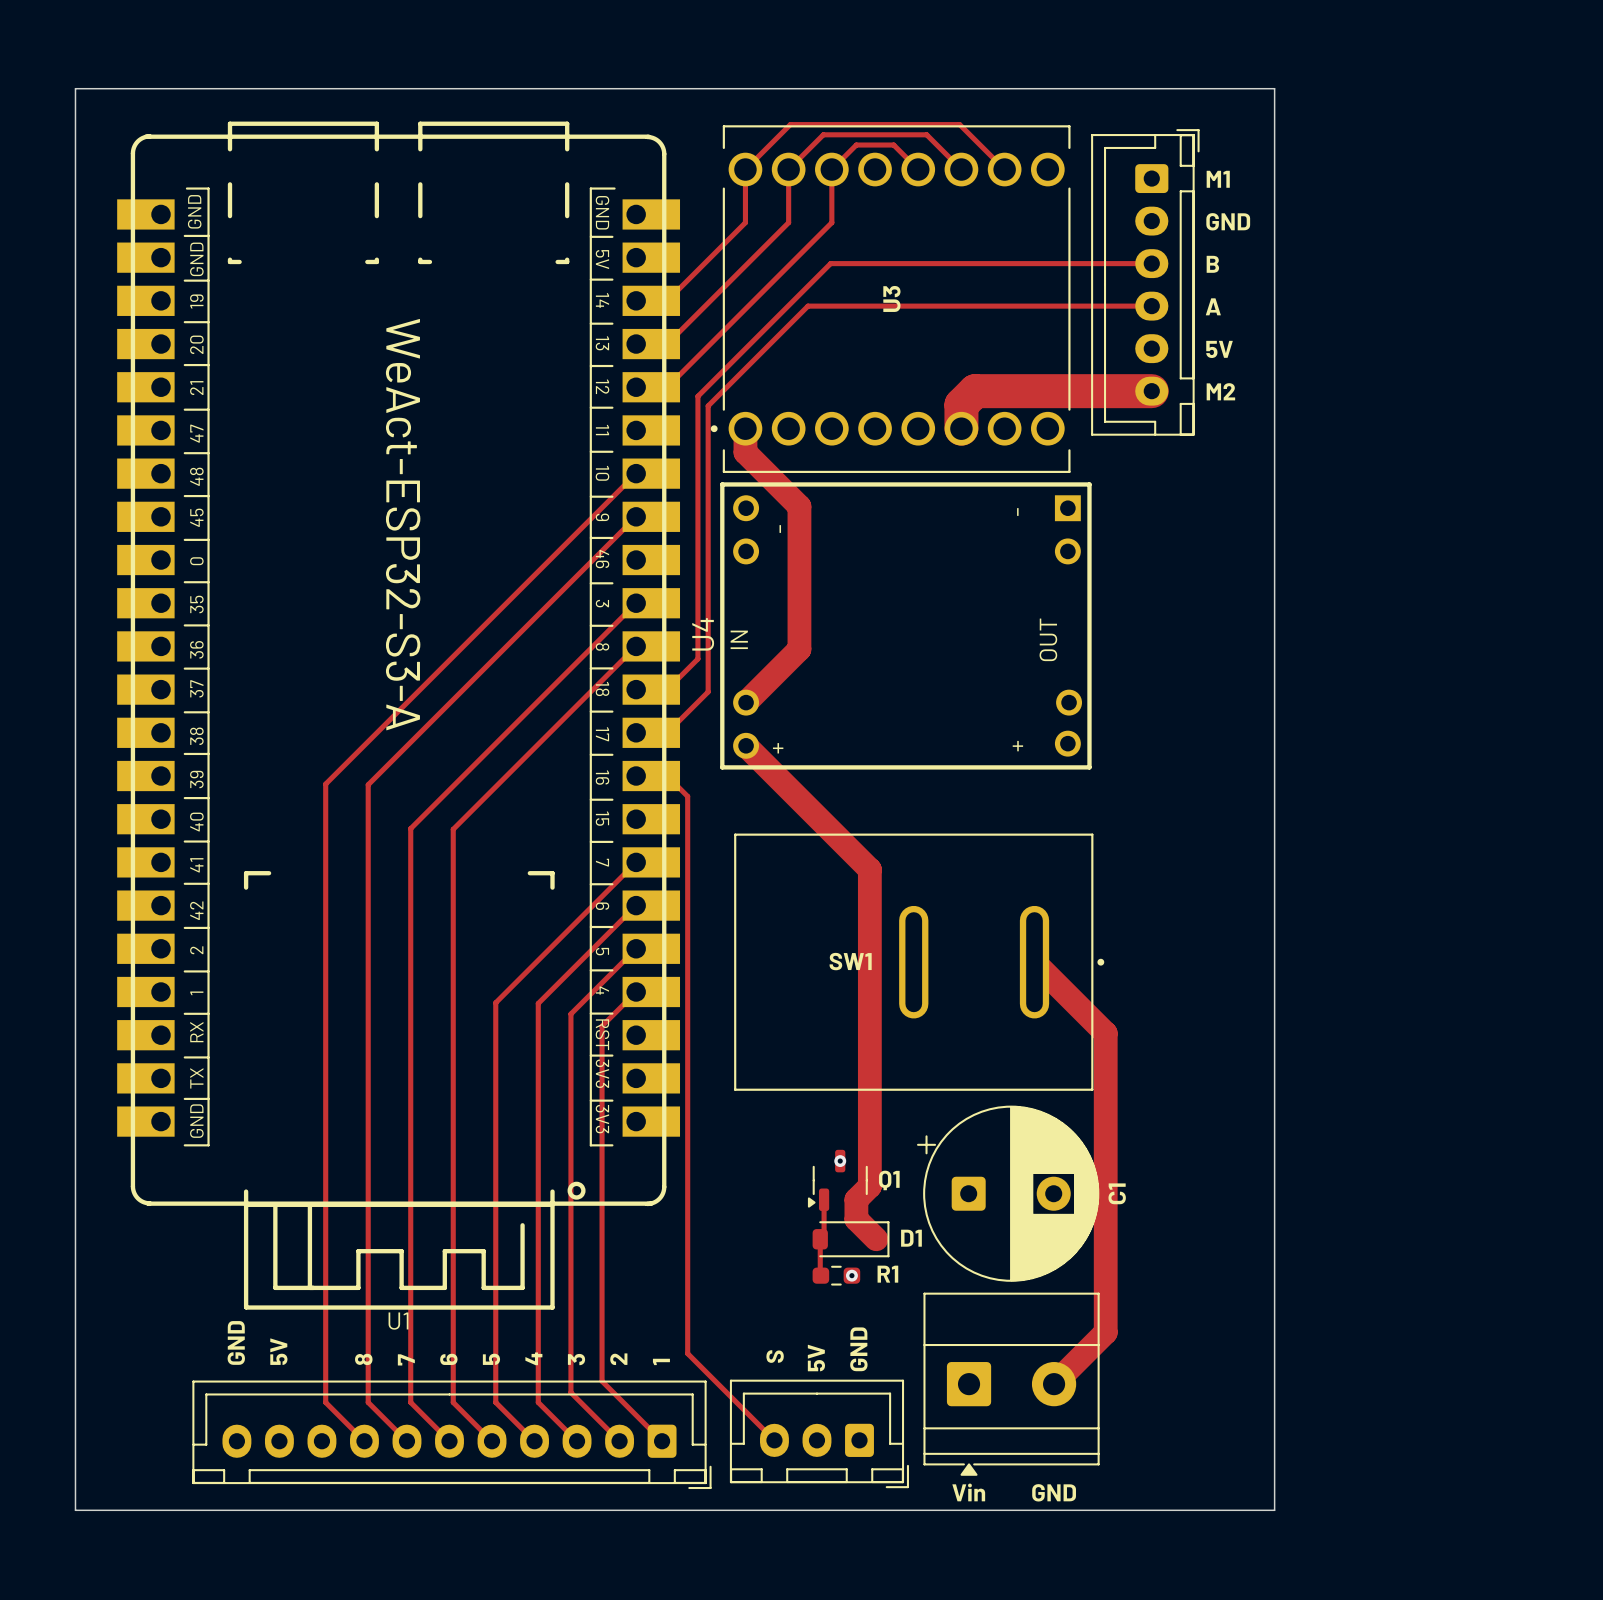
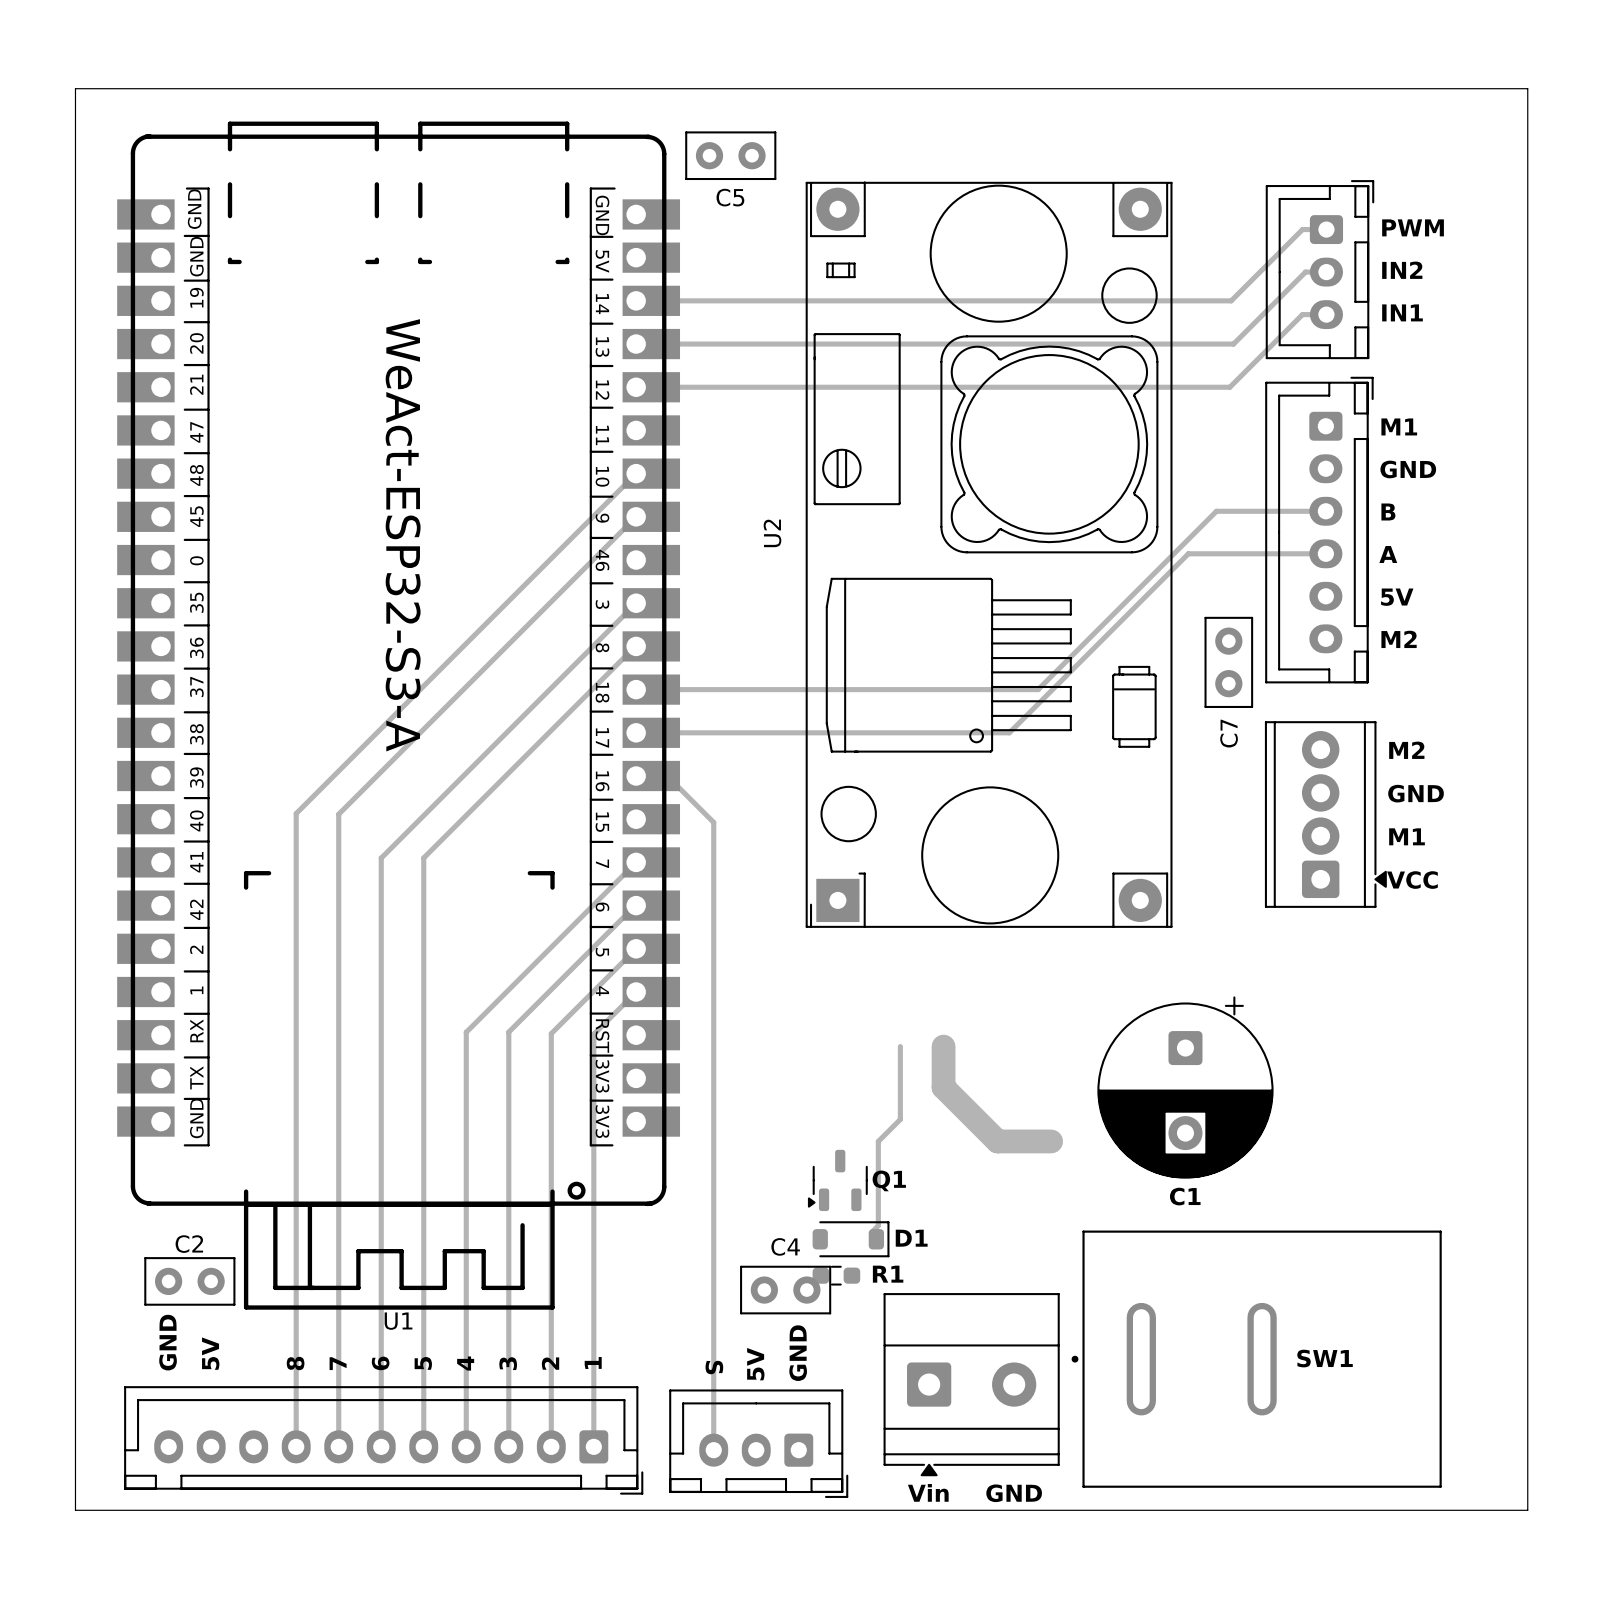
board edge: (1274, 88) (1274, 1510) -> (1274, 88) (1527, 88) (1527, 1510) (1274, 1510)
C5: none -> (730, 155)
track: (918, 169) (893, 145) (856, 145) (831, 169) (831, 222) (667, 387) -> (1326, 314) (1302, 314) (1229, 387) (667, 387)
track: (961, 169) (926, 134) (823, 134) (788, 169) (788, 222) (667, 344) -> (1326, 272) (1305, 272) (1233, 344) (667, 344)
track: (1004, 169) (959, 124) (790, 124) (745, 169) (745, 222) (667, 300) -> (1326, 229) (1302, 229) (1231, 300) (667, 300)
track: (1151, 263) (830, 263) (697, 396) (697, 658) (667, 689) -> (1325, 511) (1216, 511) (1038, 689) (667, 689)
part: none -> (1319, 269)
part position: (1145, 282) -> (1319, 530)
U3: (890, 299) -> none
track: (1151, 306) (808, 306) (708, 405) (708, 691) (667, 732) -> (1325, 553) (1188, 553) (1009, 732) (667, 732)
track: (1151, 391) (975, 391) (961, 404) (961, 428) -> none
track: (745, 428) (745, 452) (799, 506) (799, 649) (746, 702) -> none
U2: none -> (989, 554)
U4: (905, 625) -> none
track: (636, 646) (453, 829) (453, 1402) (492, 1441) -> (636, 646) (423, 857) (423, 1446)
C7: none -> (1228, 662)
track: (746, 745) (869, 869) (869, 1186) (856, 1199) (856, 1219) (876, 1239) -> none
track: (325, 784) (325, 1402) (364, 1441) -> (325, 784) (296, 813) (296, 1446)
track: (368, 784) (368, 1402) (406, 1441) -> (368, 784) (338, 814) (338, 1446)
track: (687, 796) (687, 1353) (774, 1440) -> (687, 796) (713, 822) (713, 1450)
part: none -> (1325, 814)
track: (410, 828) (410, 1402) (449, 1441) -> (410, 828) (381, 858) (381, 1446)
track: (636, 905) (538, 1003) (538, 1402) (577, 1441) -> (636, 905) (508, 1032) (508, 1446)
SW1 rotation: 0° (919, 962) -> 180° (1256, 1359)
SW1 position: (919, 962) -> (1256, 1359)
track: (1034, 962) (1105, 1033) (1105, 1332) (1054, 1384) -> none
track: (495, 1002) (495, 1402) (534, 1441) -> (495, 1002) (466, 1032) (466, 1446)
track: (570, 1014) (570, 1392) (619, 1441) -> (570, 1014) (551, 1033) (551, 1446)
track: (602, 1026) (602, 1381) (662, 1441) -> (602, 1026) (593, 1034) (593, 1446)
track: none -> (900, 1046) (900, 1119) (878, 1141) (878, 1225) (872, 1231)
track: none -> (943, 1046) (943, 1087) (997, 1141) (1051, 1141)
via: (840, 1161) -> none
C1 rotation: 0° (1008, 1193) -> 90° clockwise (1185, 1087)
C1 position: (1008, 1193) -> (1185, 1087)
track: (824, 1199) (824, 1235) (820, 1239) (820, 1275) -> none
via: (851, 1275) -> none
C2: none -> (189, 1281)
C4: none -> (785, 1290)
part position: (1011, 1384) -> (971, 1384)
part position: (819, 1433) -> (758, 1443)
part position: (451, 1434) -> (383, 1440)

